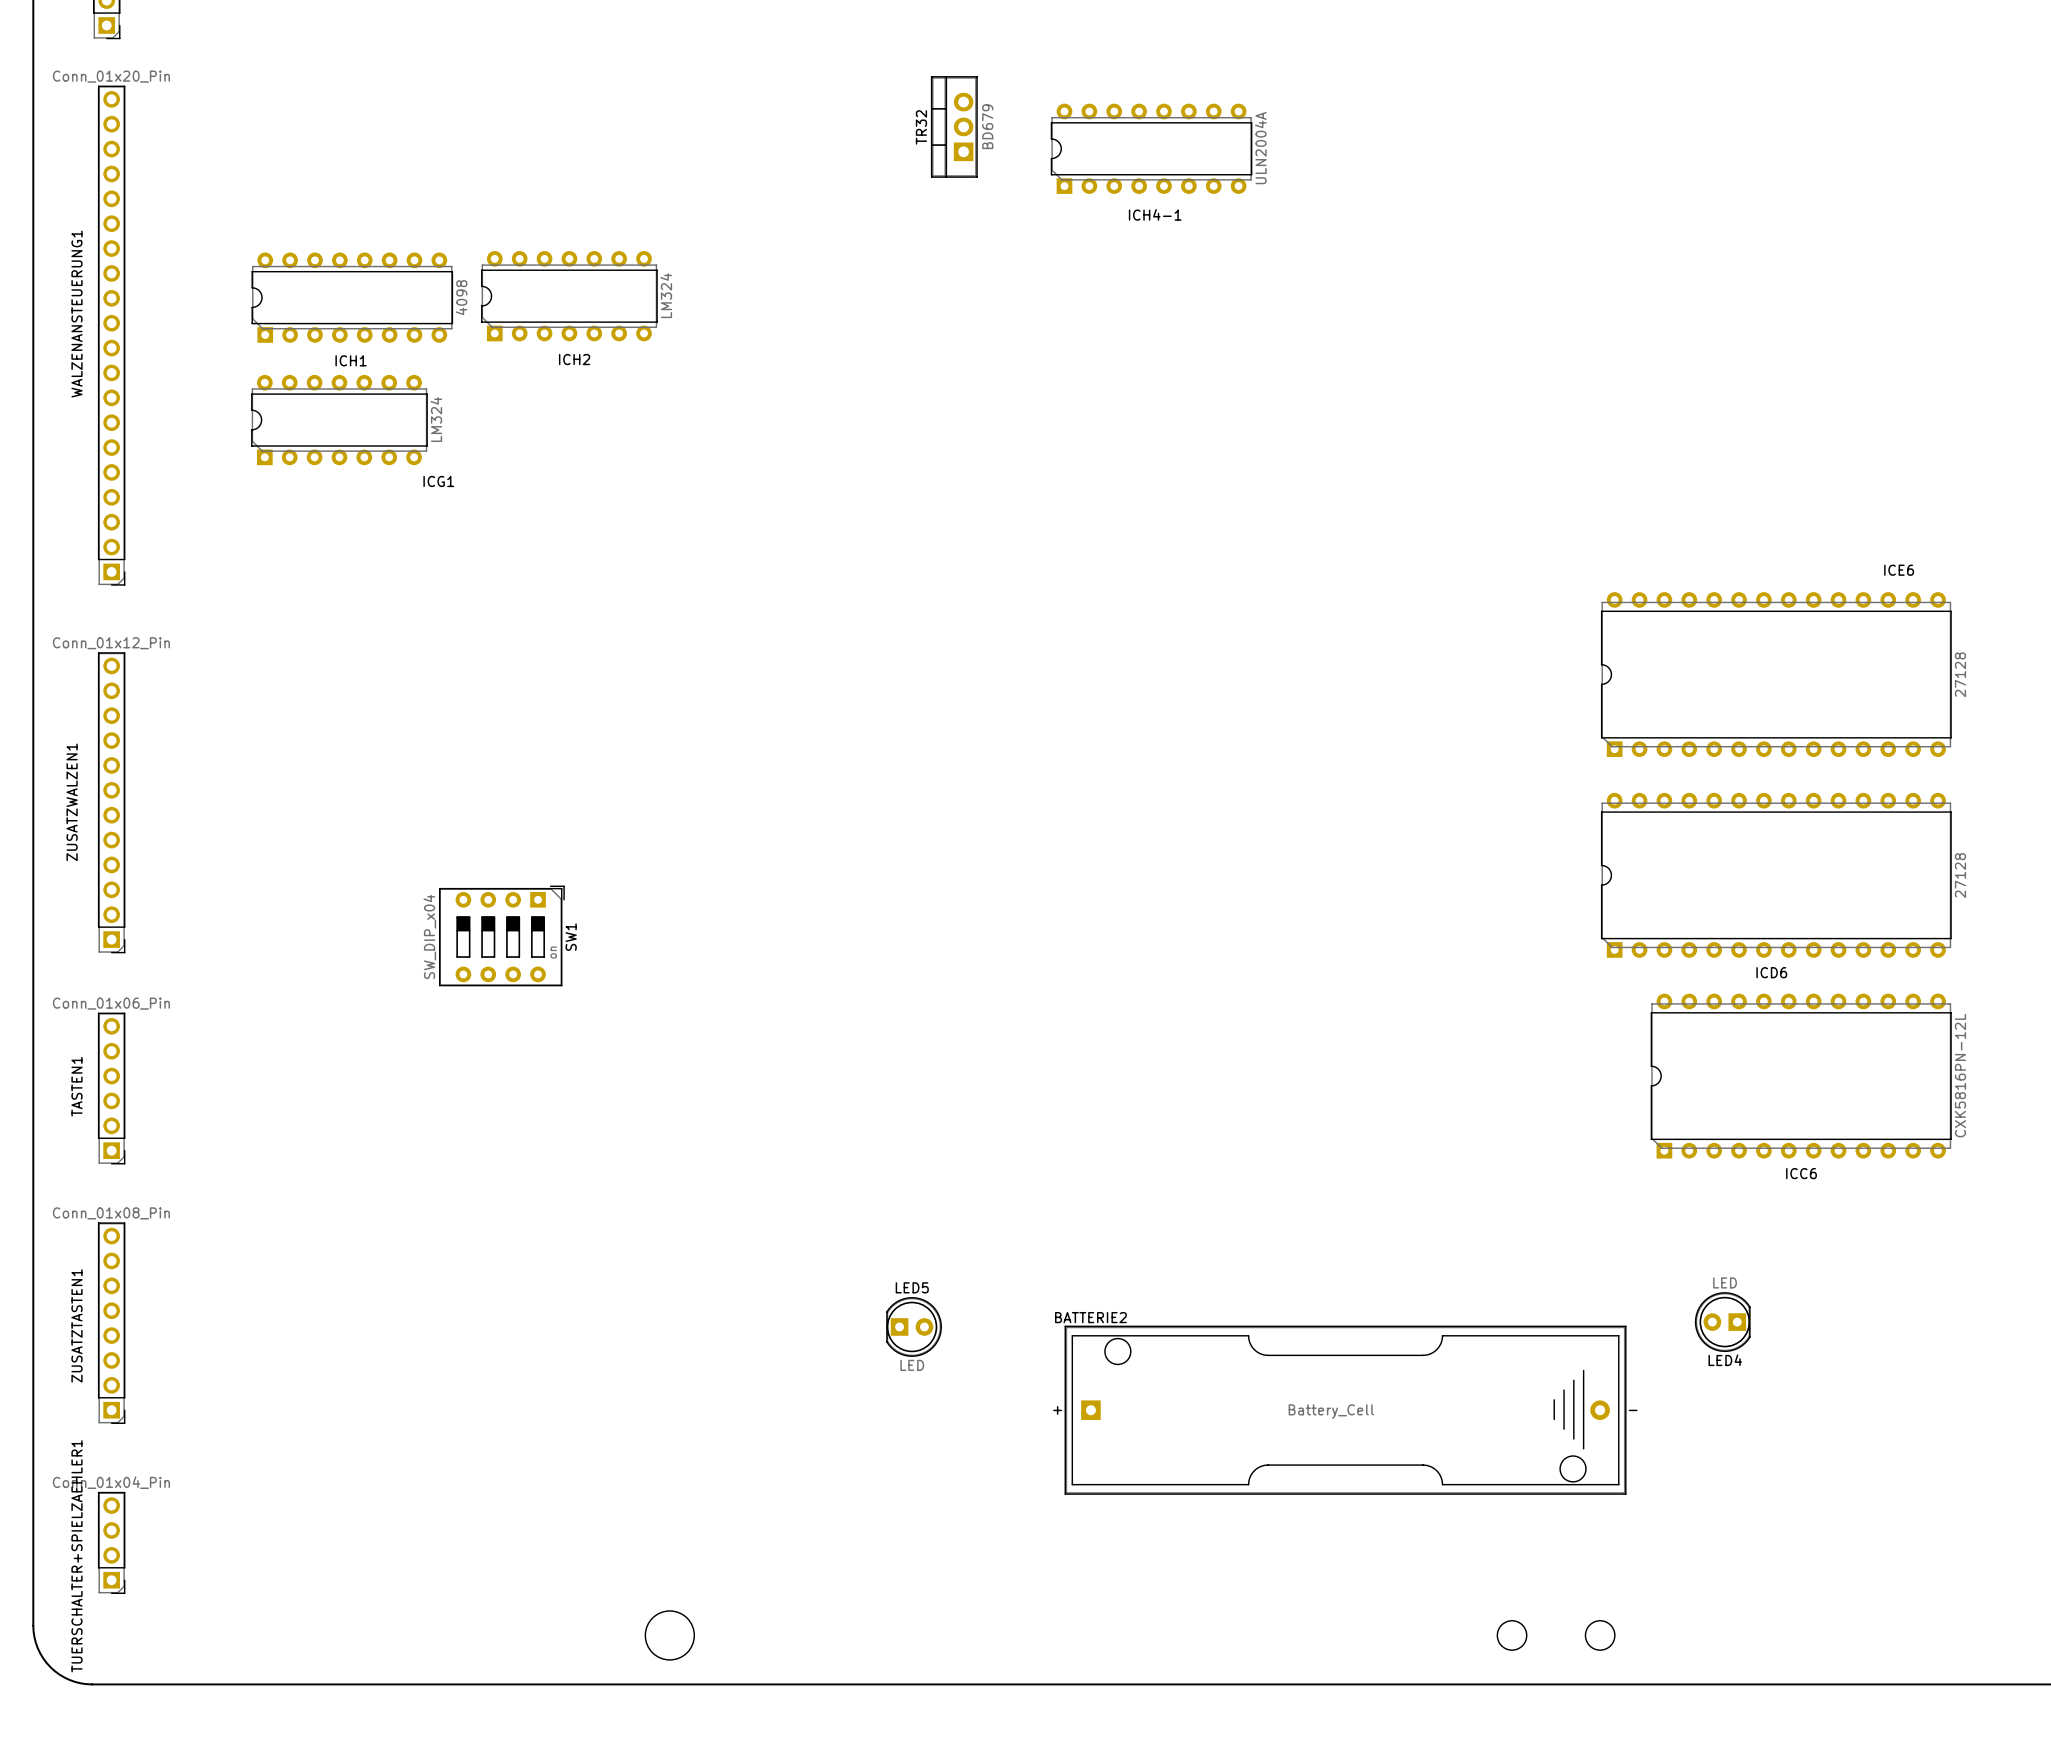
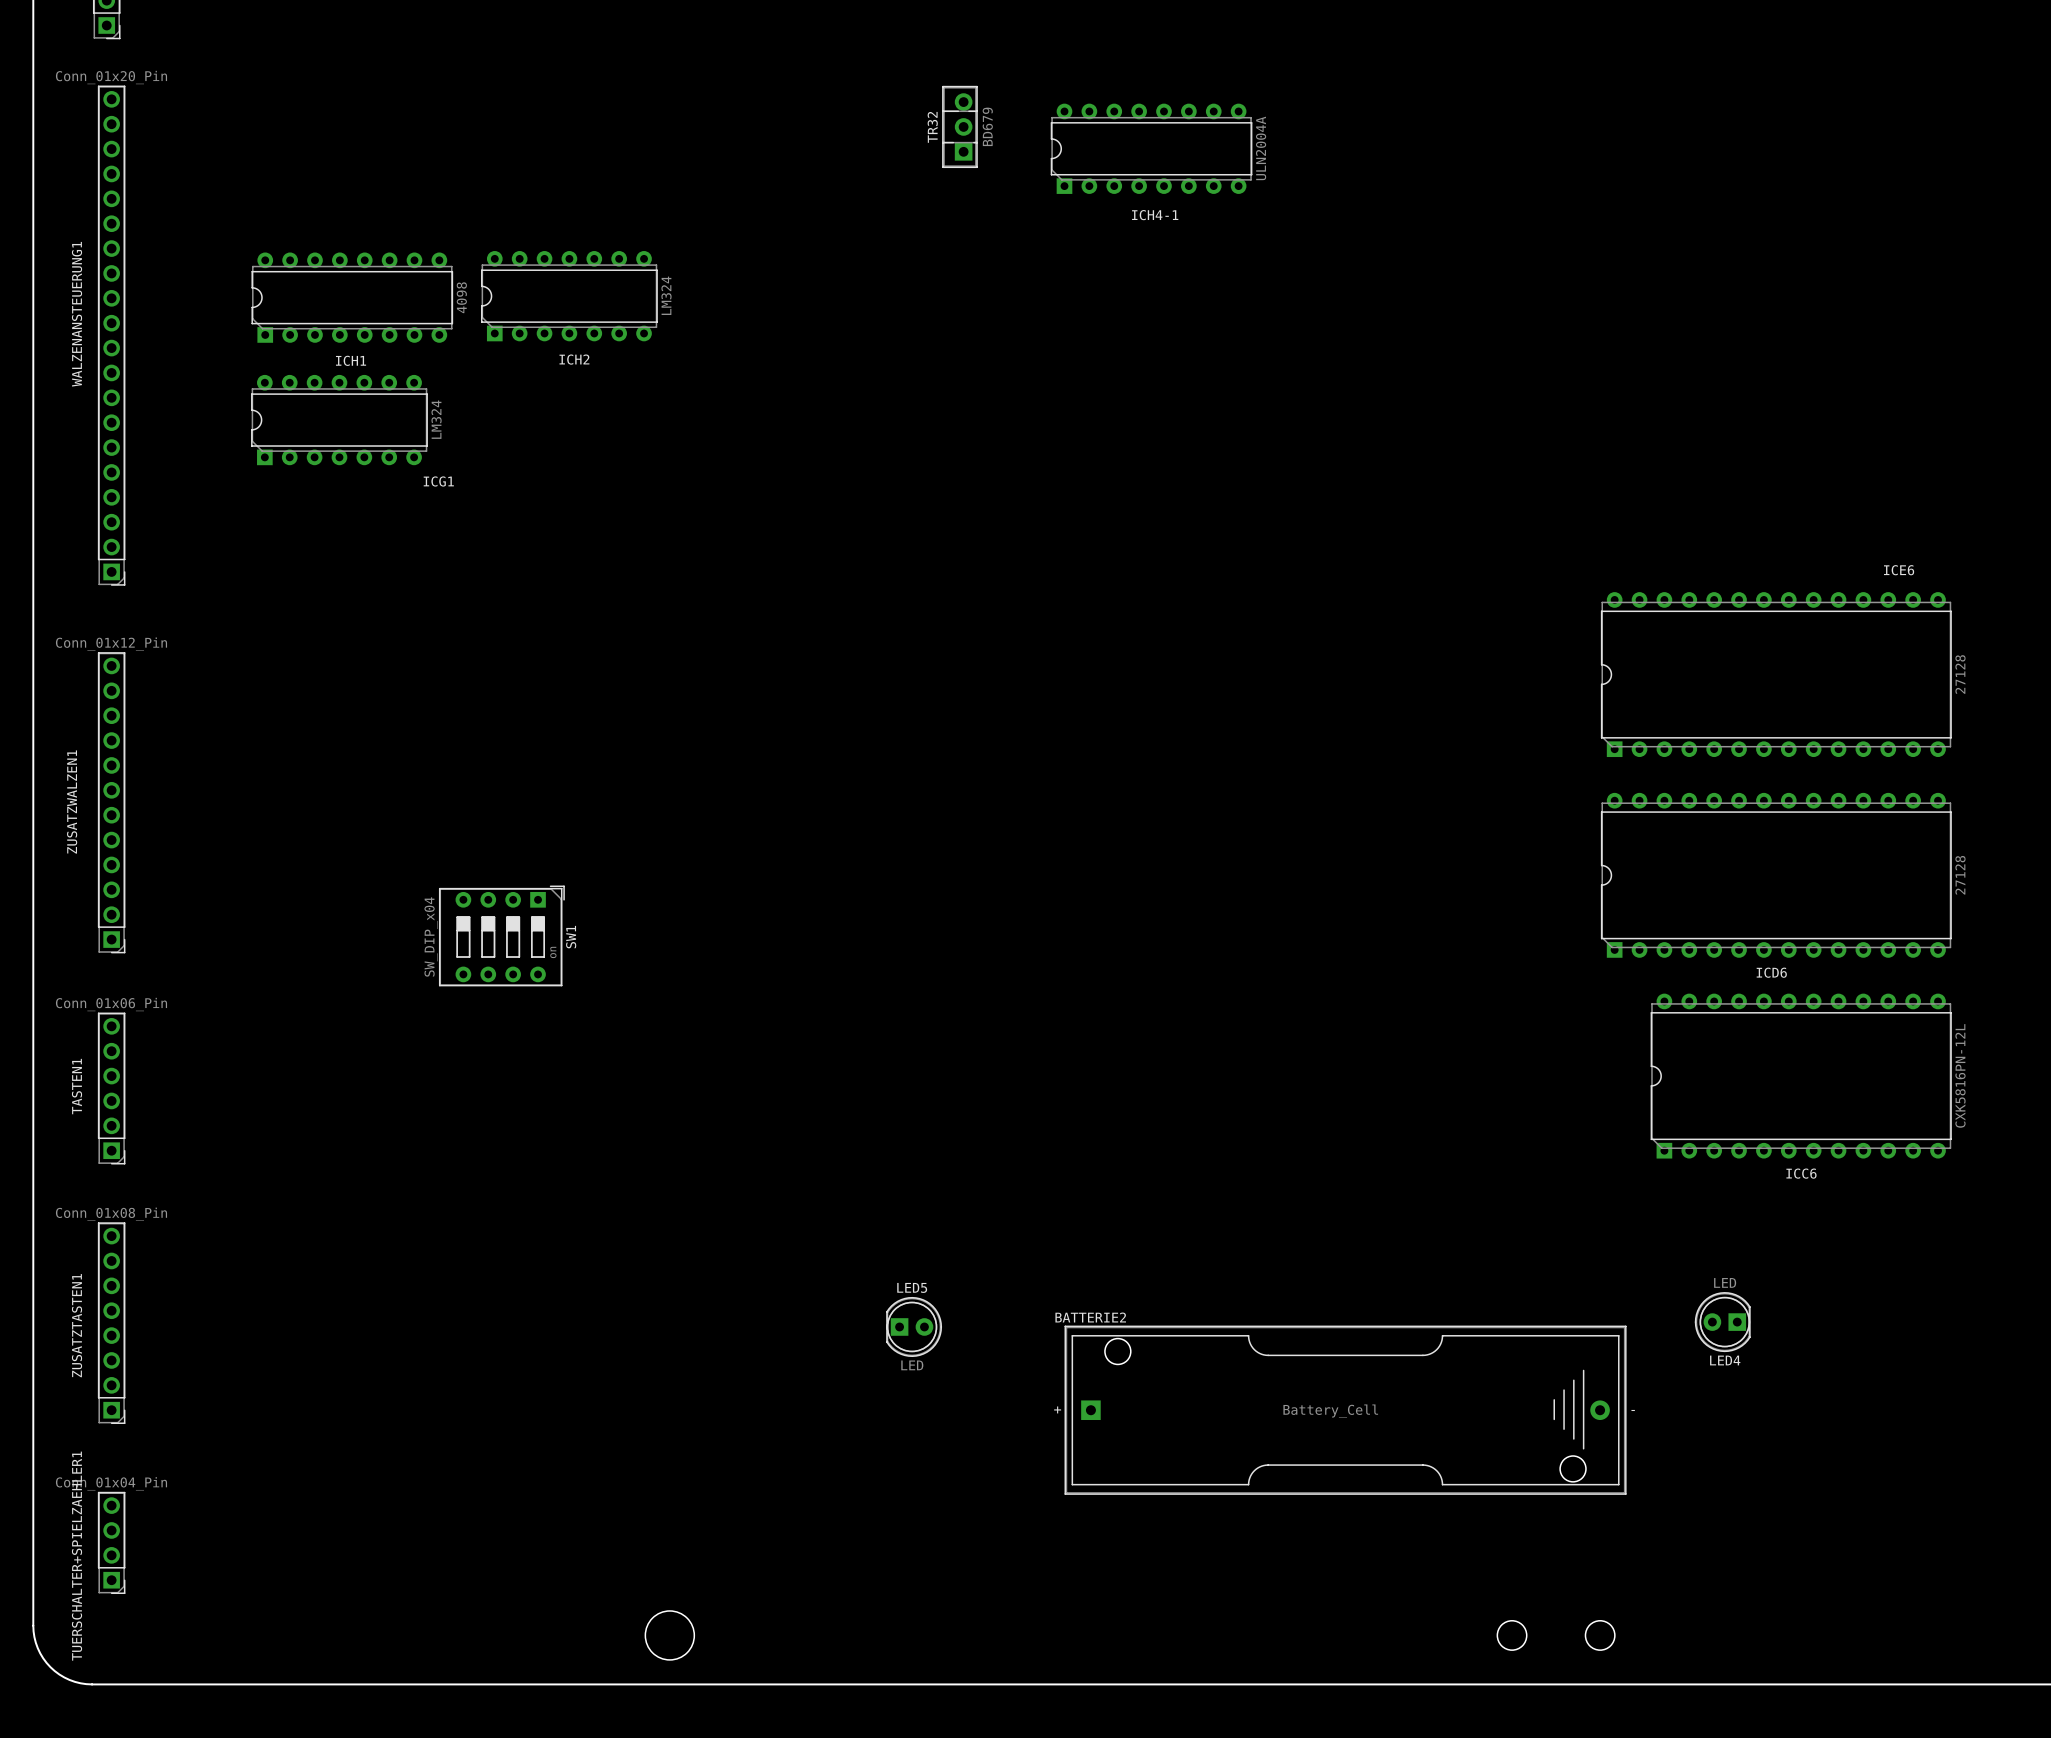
TR32 footprint: [931, 76, 978, 178] -> [942, 86, 978, 168]

